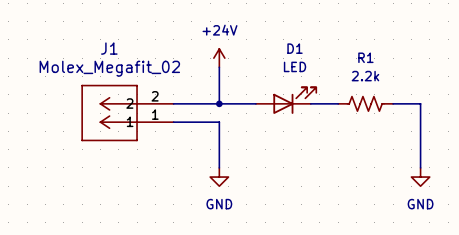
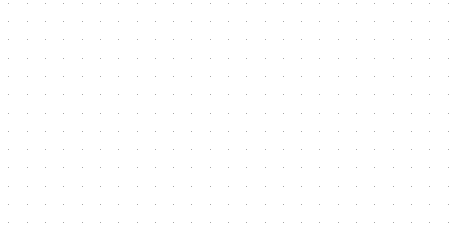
power symbol: +24V (219, 58) -> none
wire: (219, 67) (219, 103) -> none
D1: LED (286, 100) -> none
wire: (173, 103) (255, 103) -> none
junction: (219, 103) -> none
wire: (310, 103) (338, 103) -> none
R1: 2.2k (365, 103) -> none
wire: (393, 103) (420, 103) (420, 167) -> none
J1: Molex_Megafit_02 (127, 113) -> none
wire: (173, 122) (219, 122) (219, 167) -> none
power symbol: GND (219, 177) -> none
power symbol: GND (420, 177) -> none

